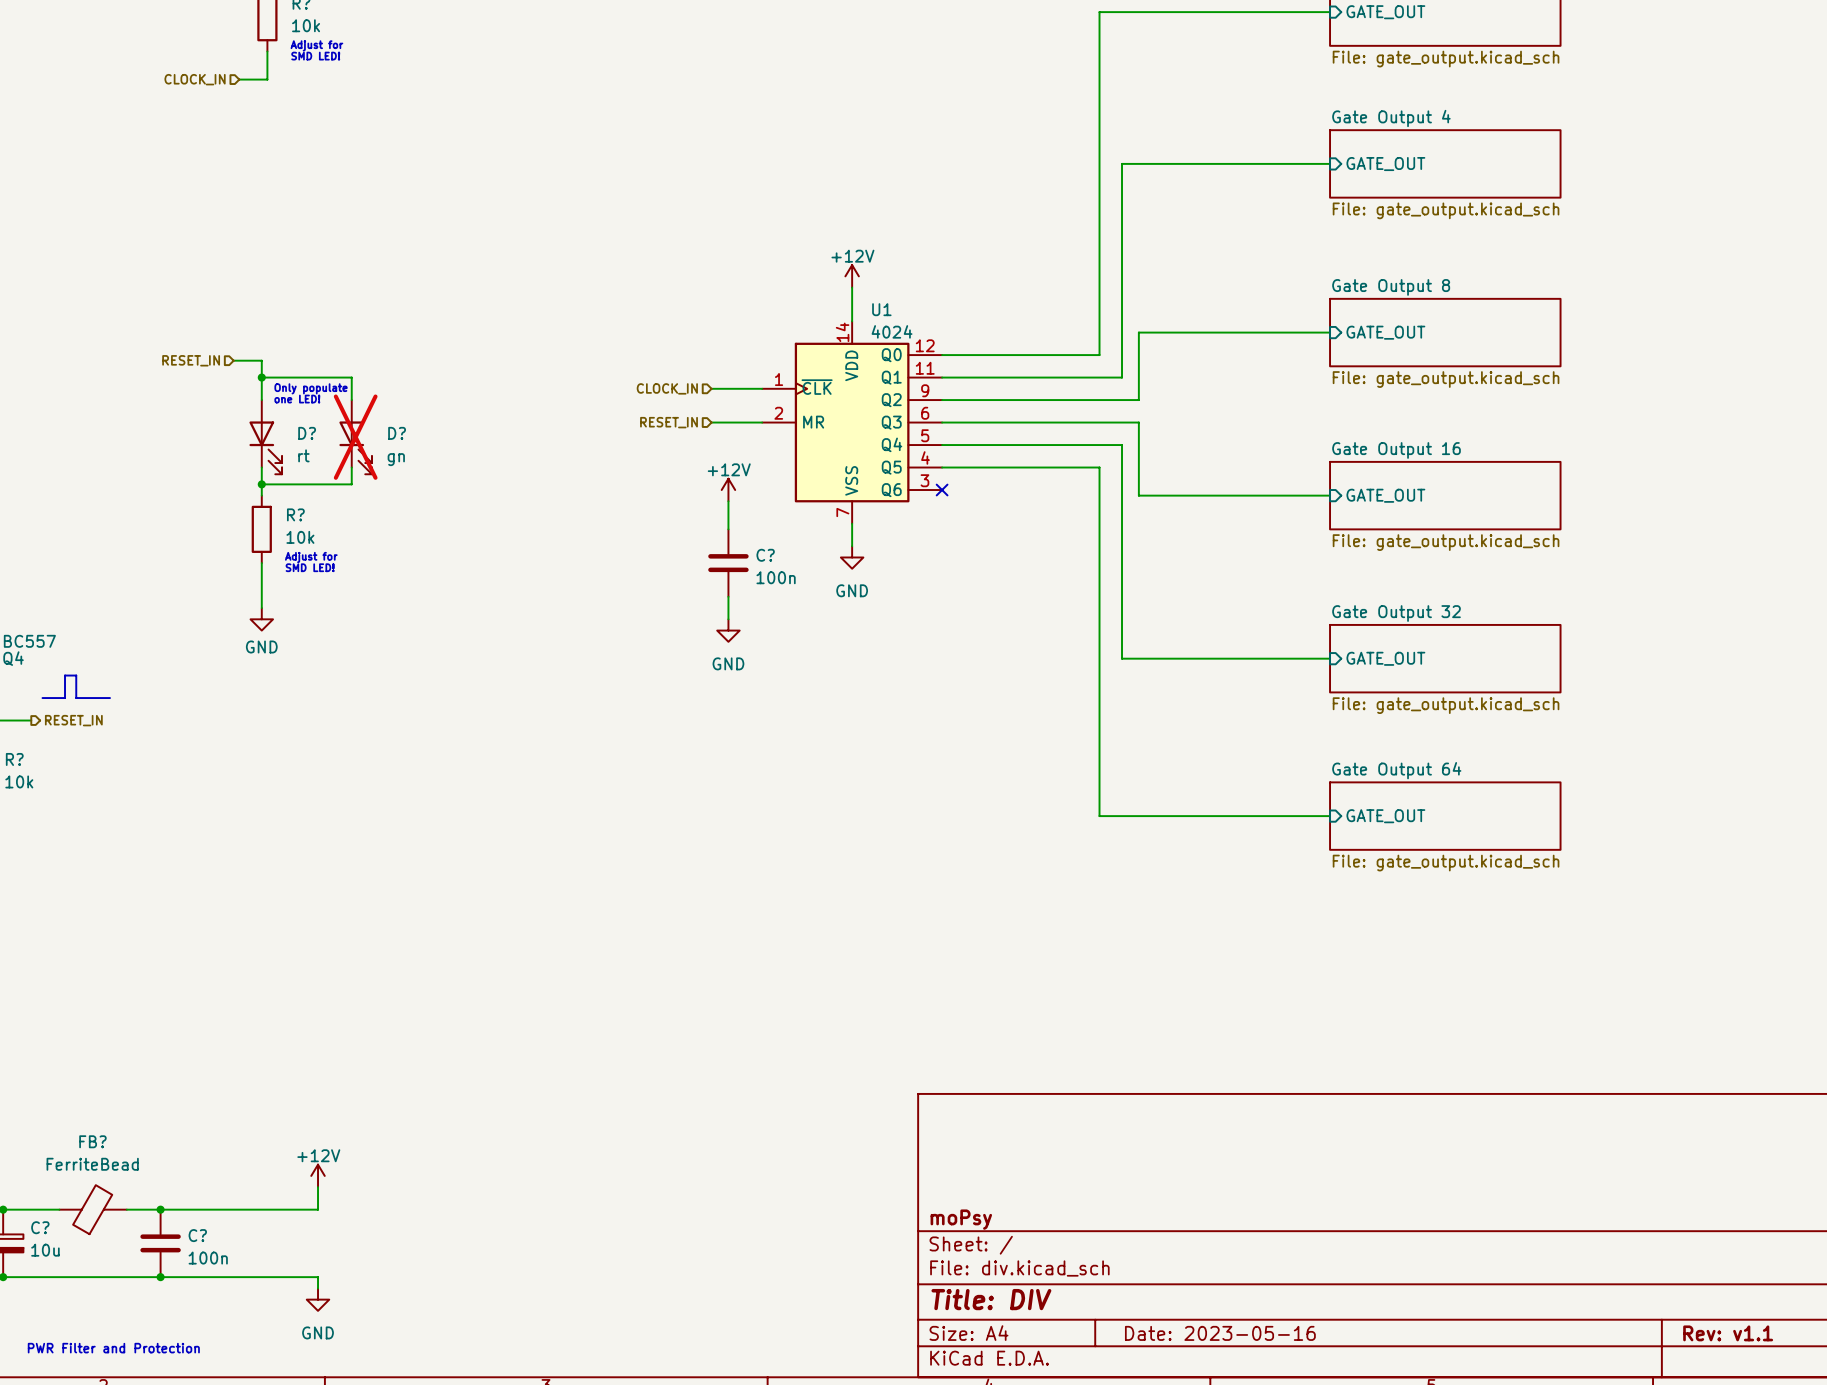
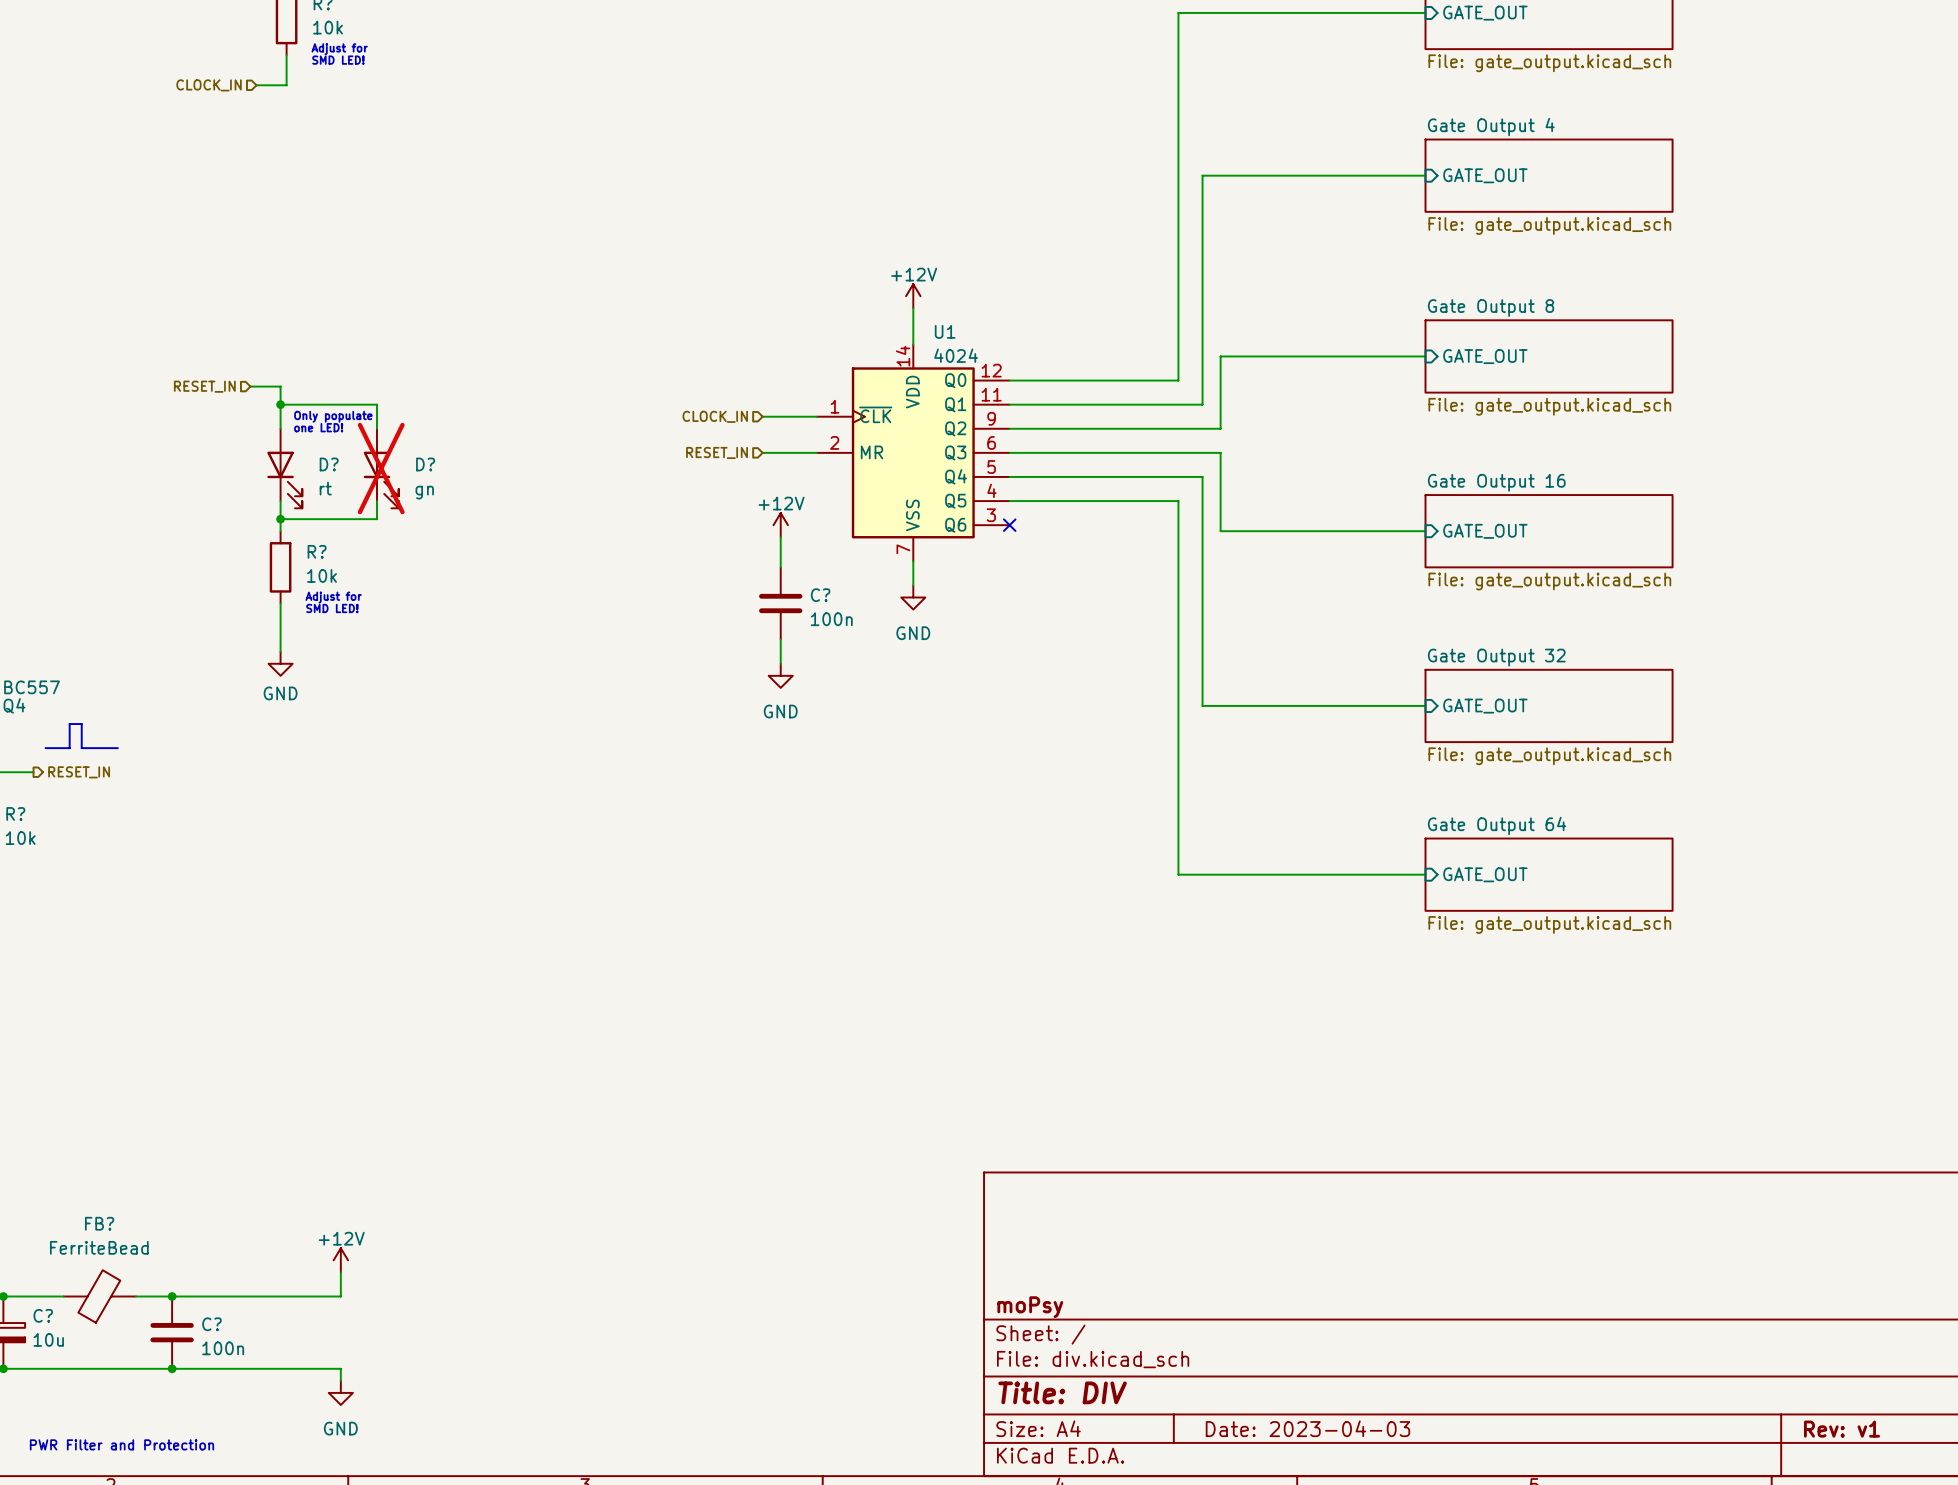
title block: Date: 2023-05-16 (1220, 1333) -> Date: 2023-04-03 (1307, 1428)
title block: Rev: v1.1 (1728, 1333) -> Rev: v1 (1842, 1429)

